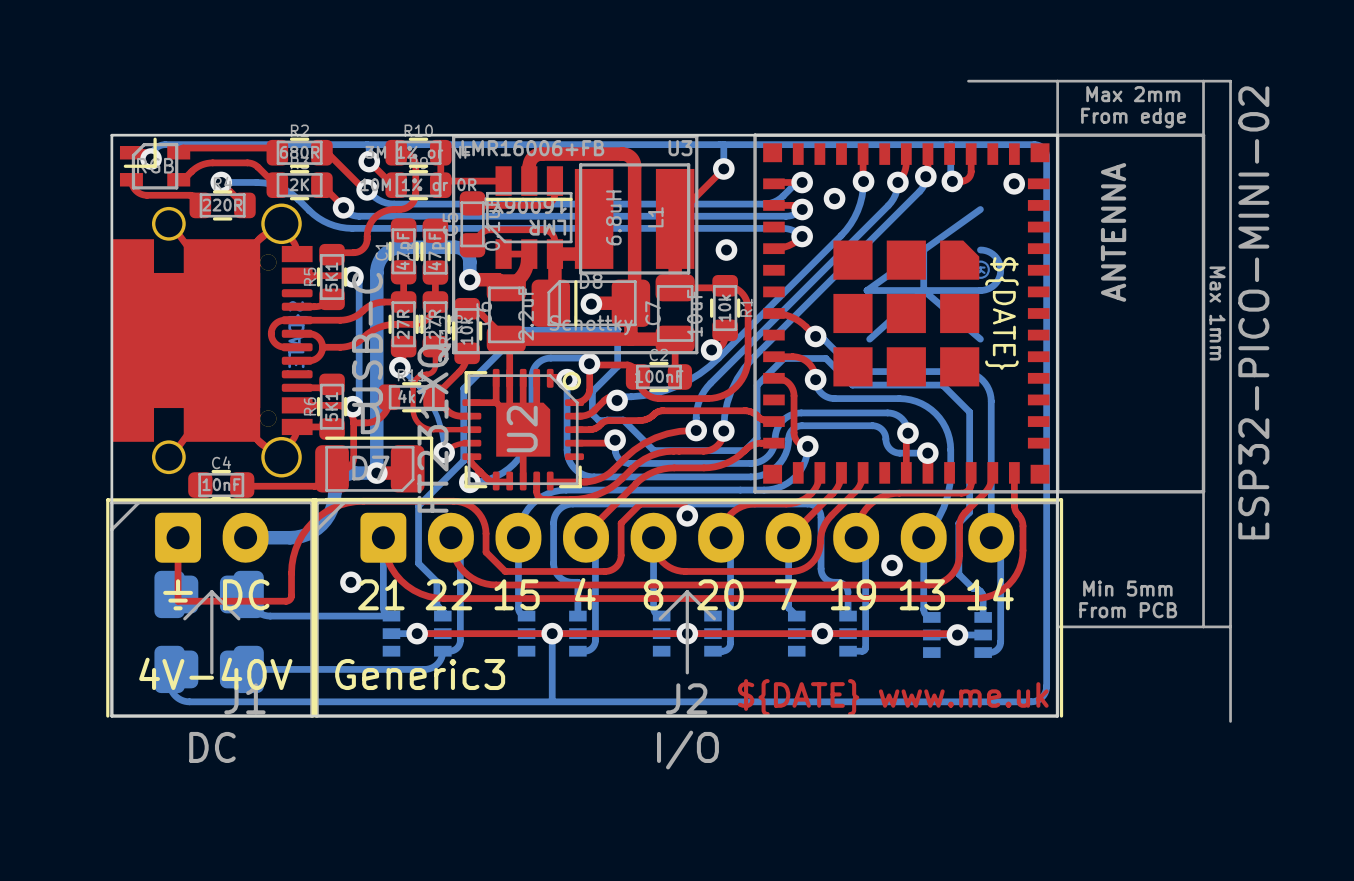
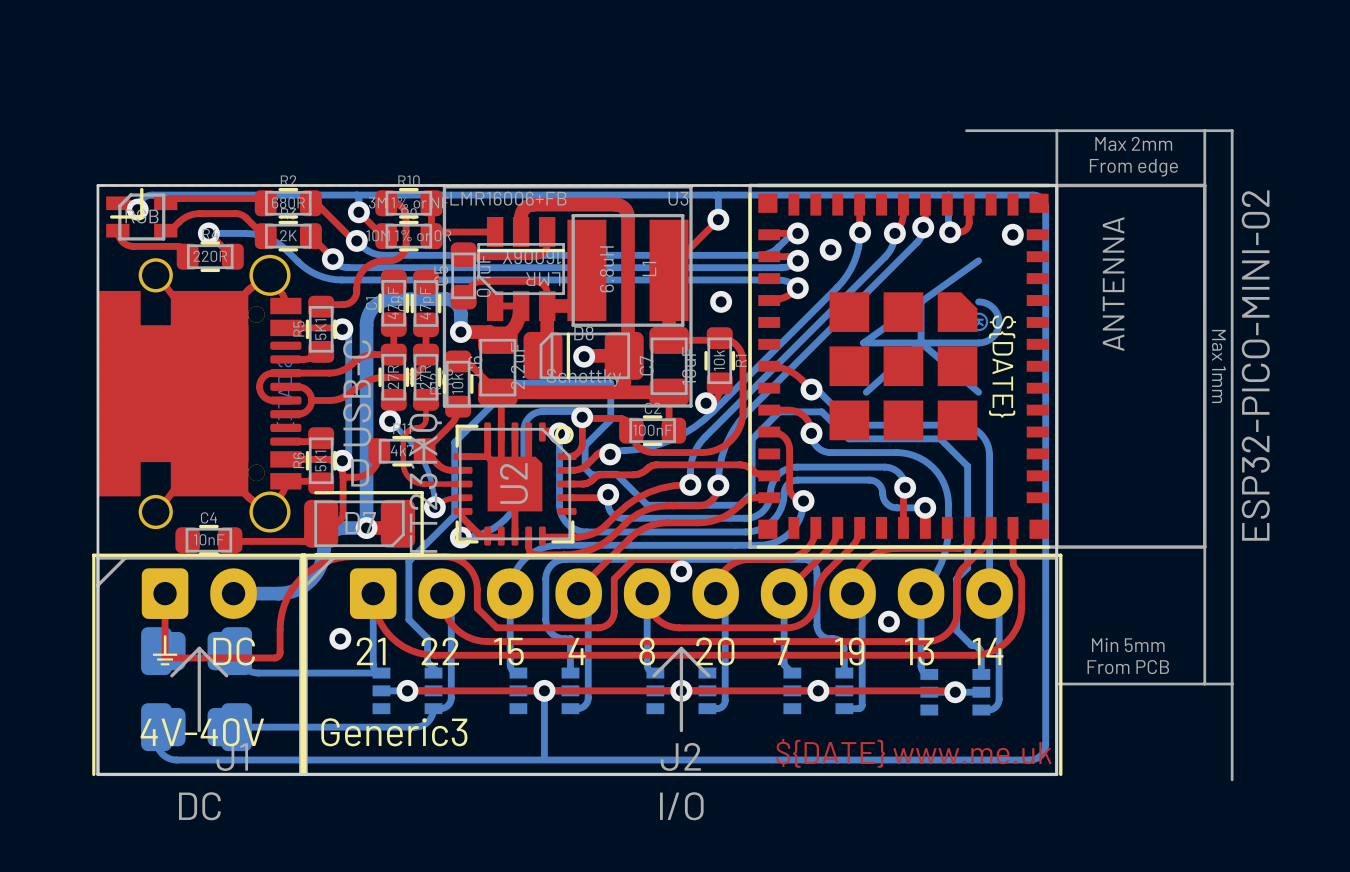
part footprint: [753, 79, 1232, 723] -> [748, 129, 1234, 782]

